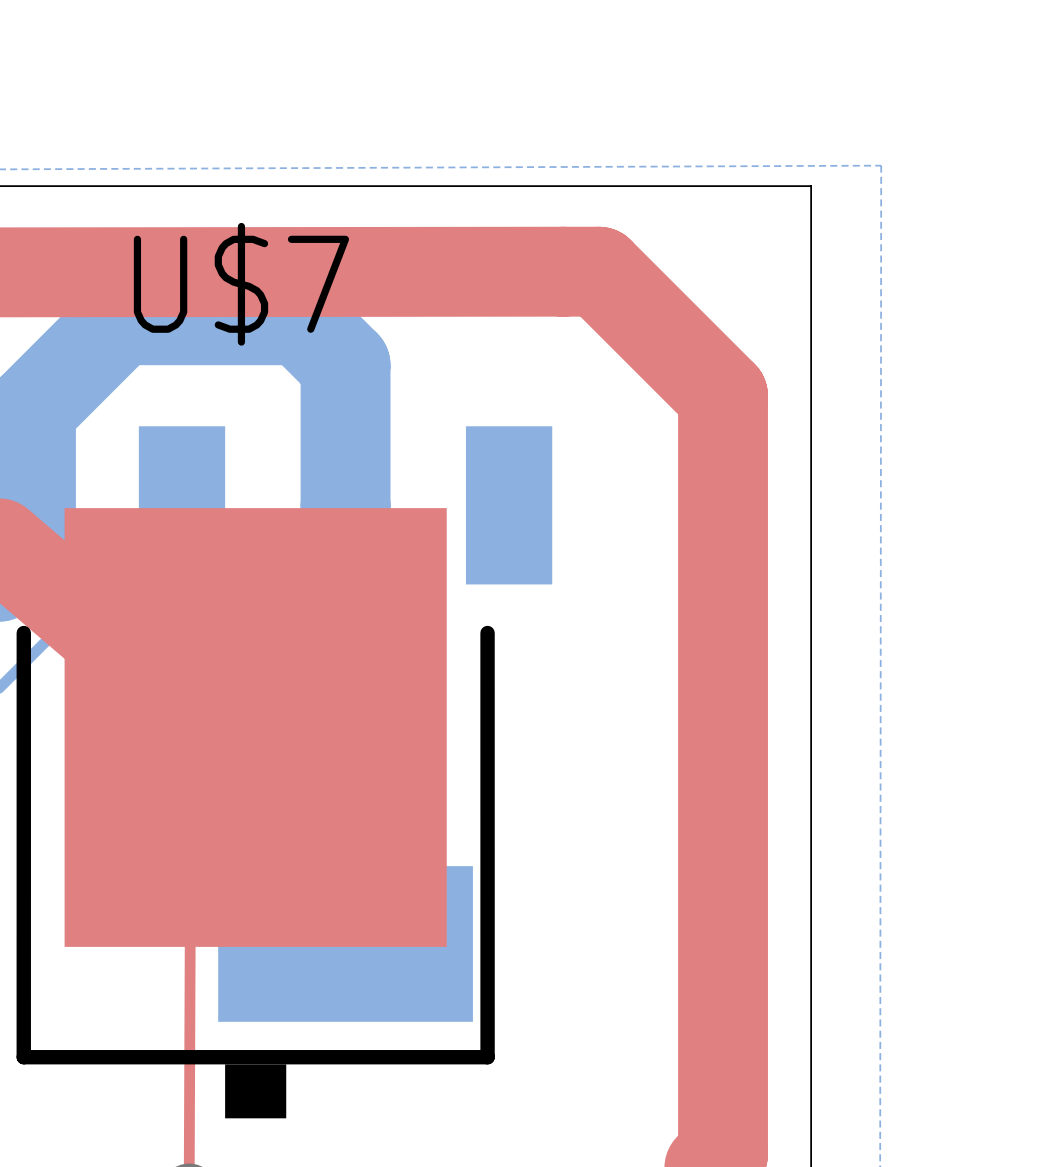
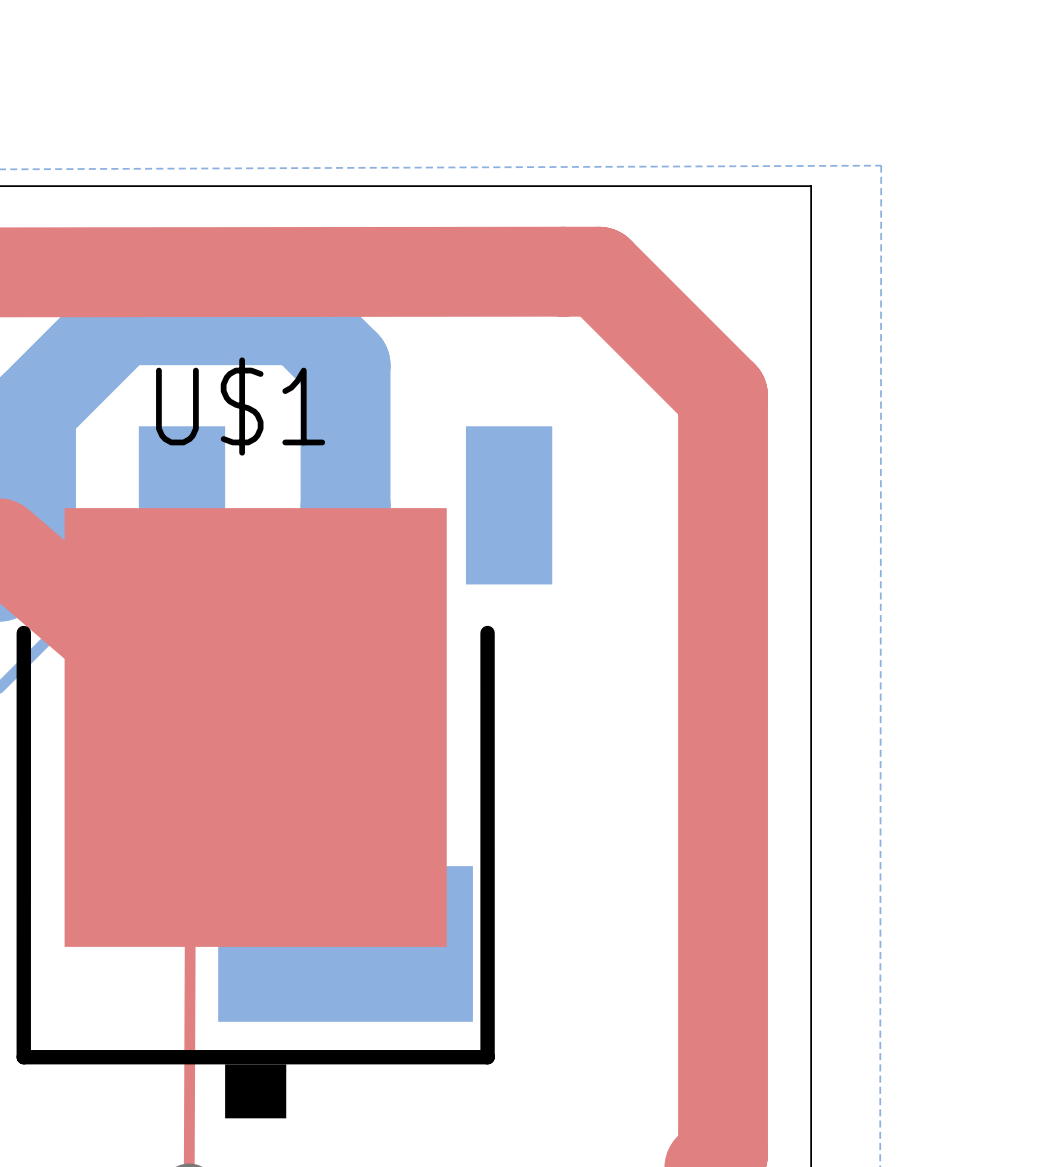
U$7 name: U$7 (241, 284) -> U$1 (240, 406)

